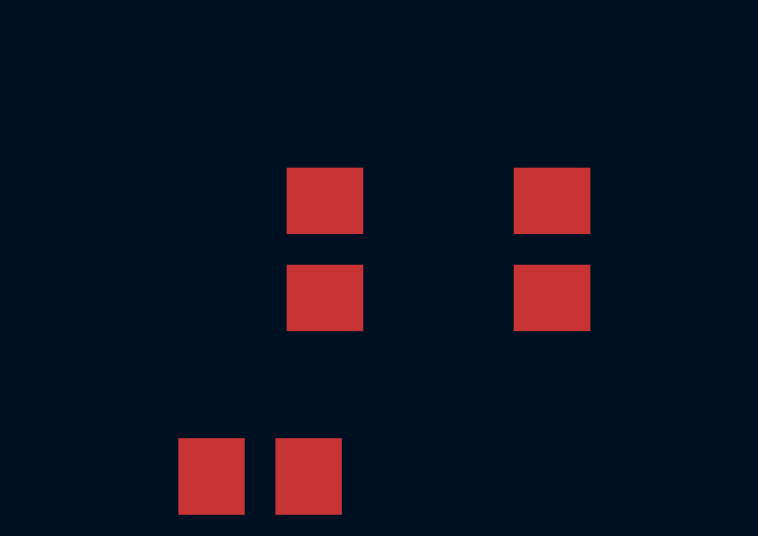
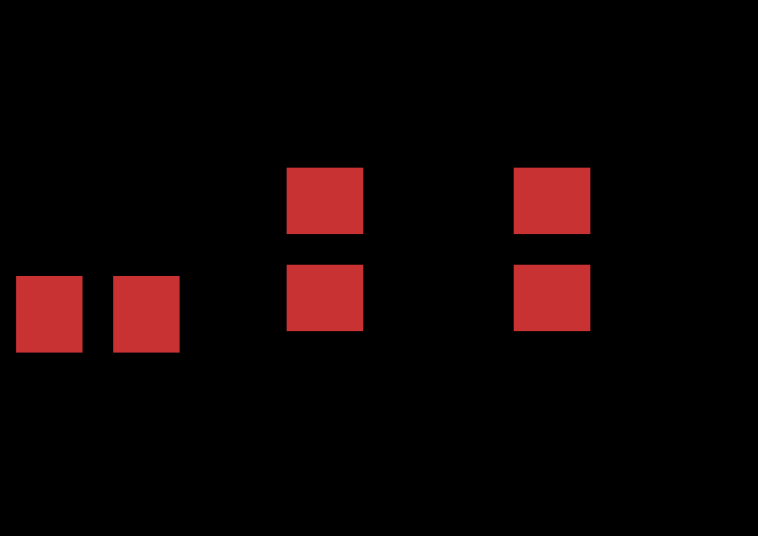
part position: (260, 476) -> (97, 314)

